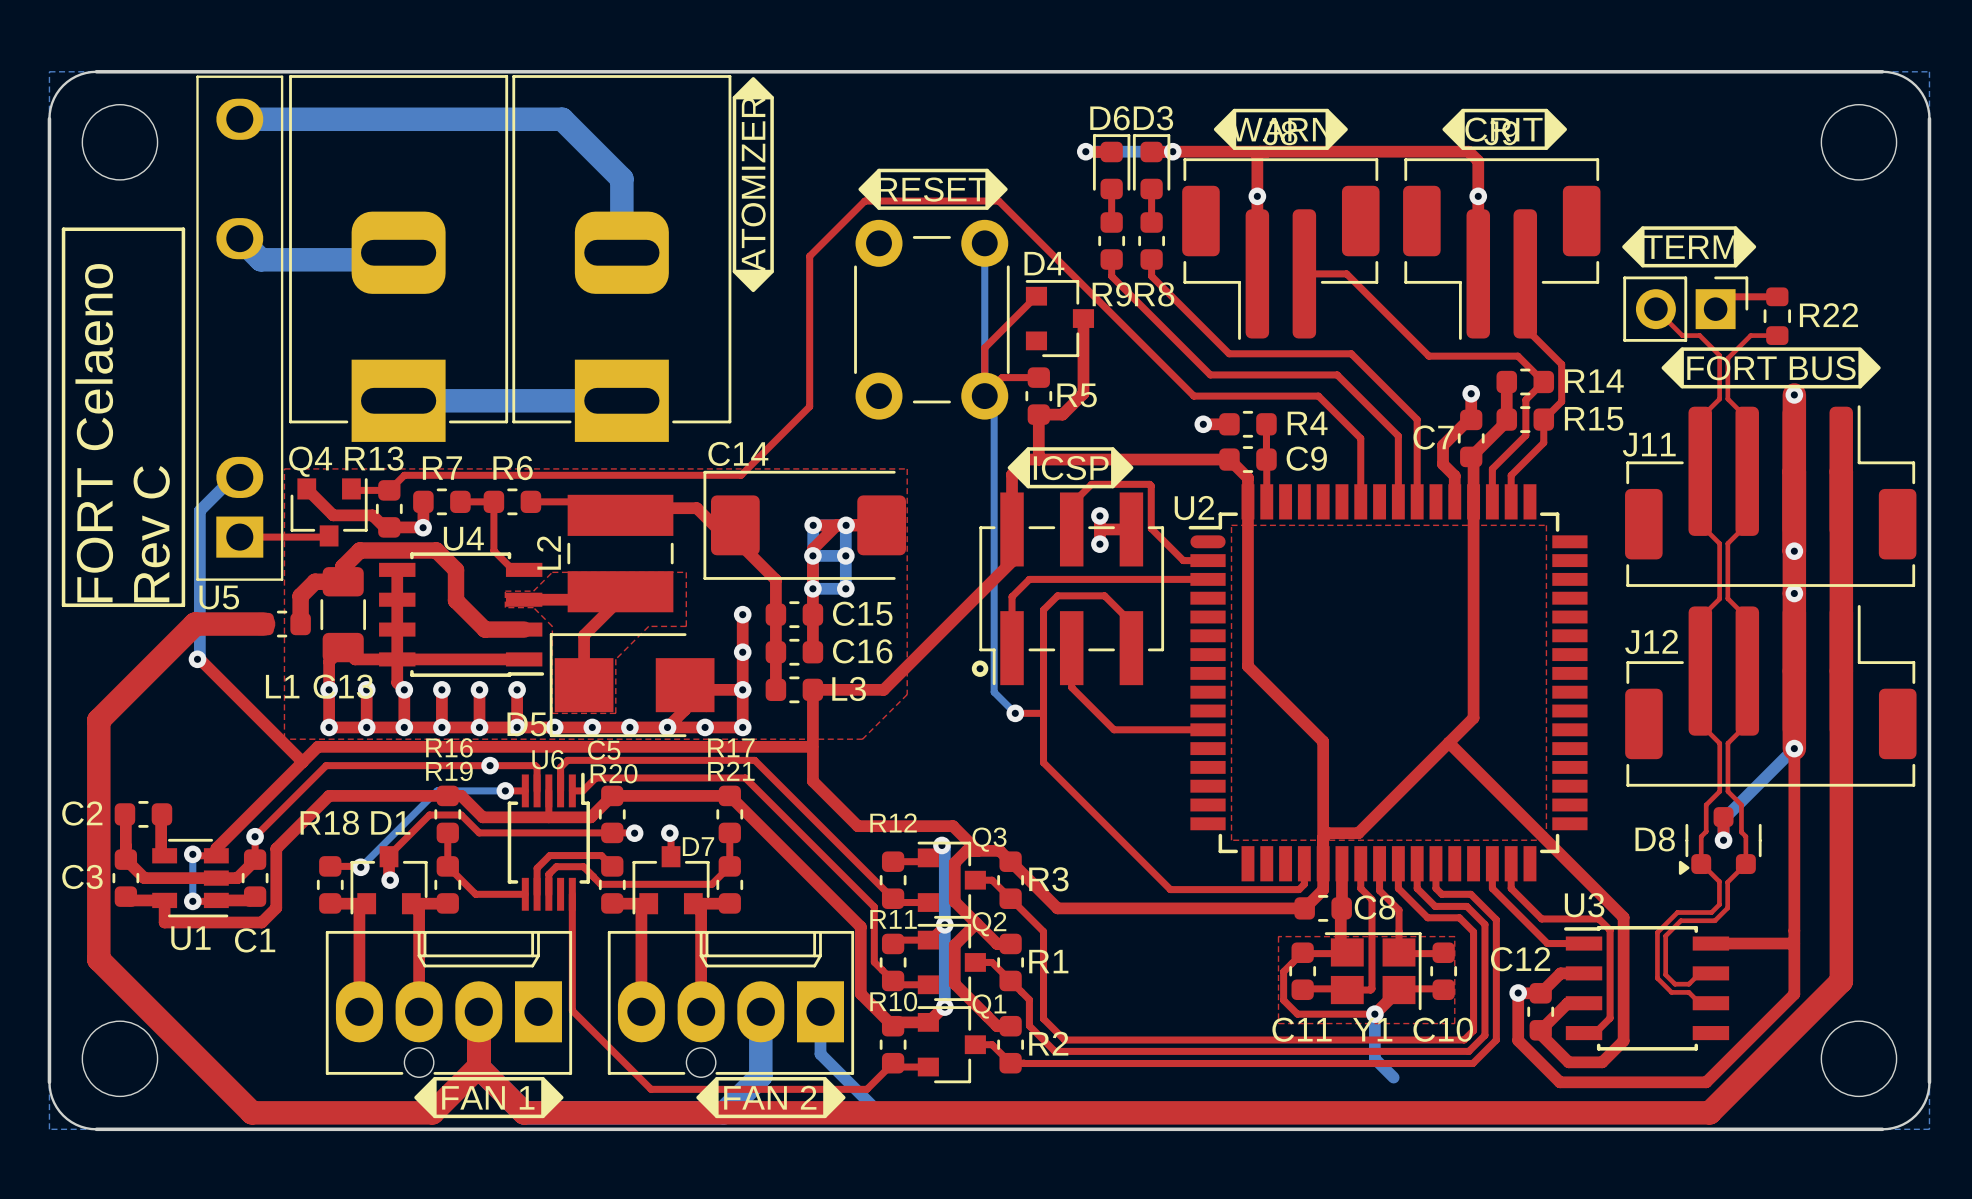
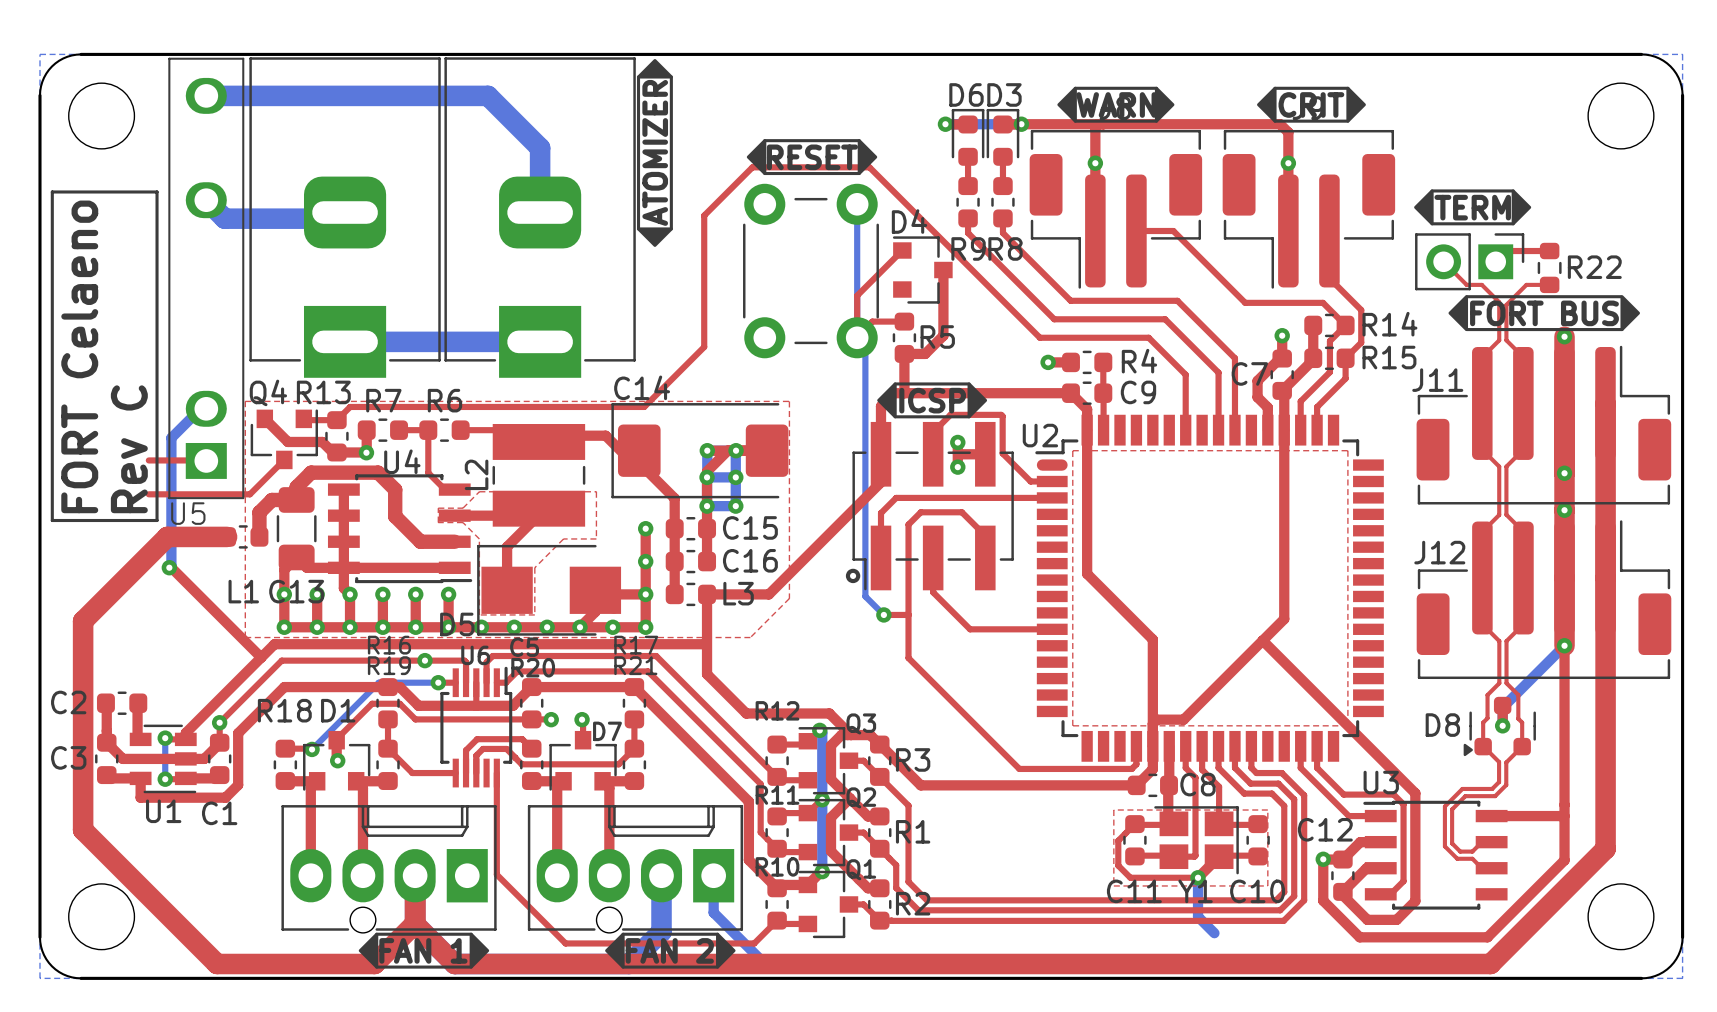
top track: none -> (148, 460) (206, 460)
top track: (239, 537) (327, 537) -> (148, 494) (249, 494) (283, 460)

